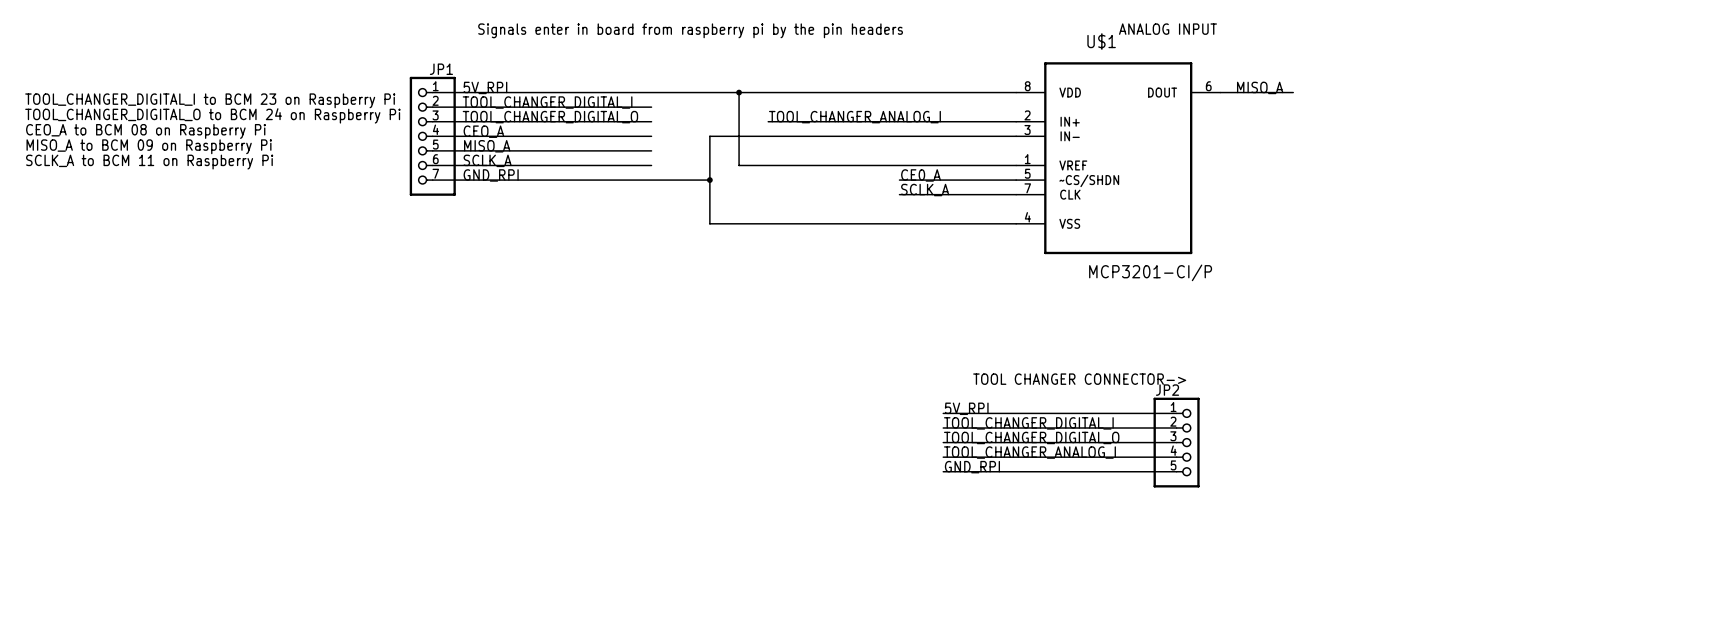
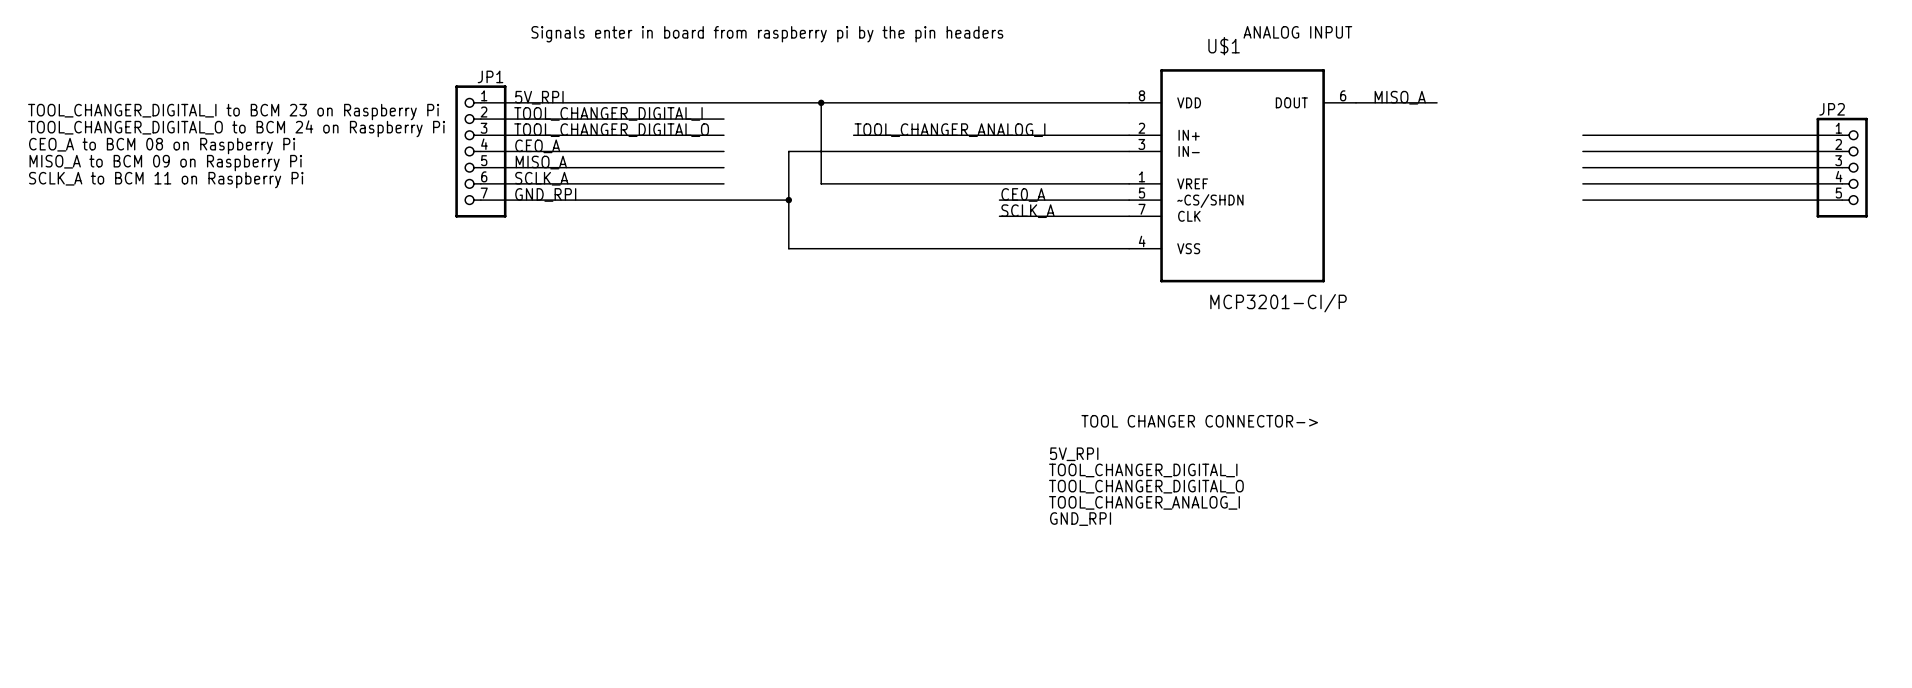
wire: none -> (1582, 135) (1842, 135)
wire: none -> (1582, 151) (1842, 151)
wire: none -> (1582, 167) (1842, 167)
wire: none -> (1582, 183) (1842, 183)
wire: none -> (1582, 200) (1842, 200)
wire: (943, 413) (1176, 413) -> none
wire: (943, 428) (1176, 428) -> none
wire: (943, 442) (1176, 442) -> none
JP2 position: (1176, 442) -> (1842, 167)
wire: (943, 457) (1176, 457) -> none
wire: (943, 471) (1176, 471) -> none

